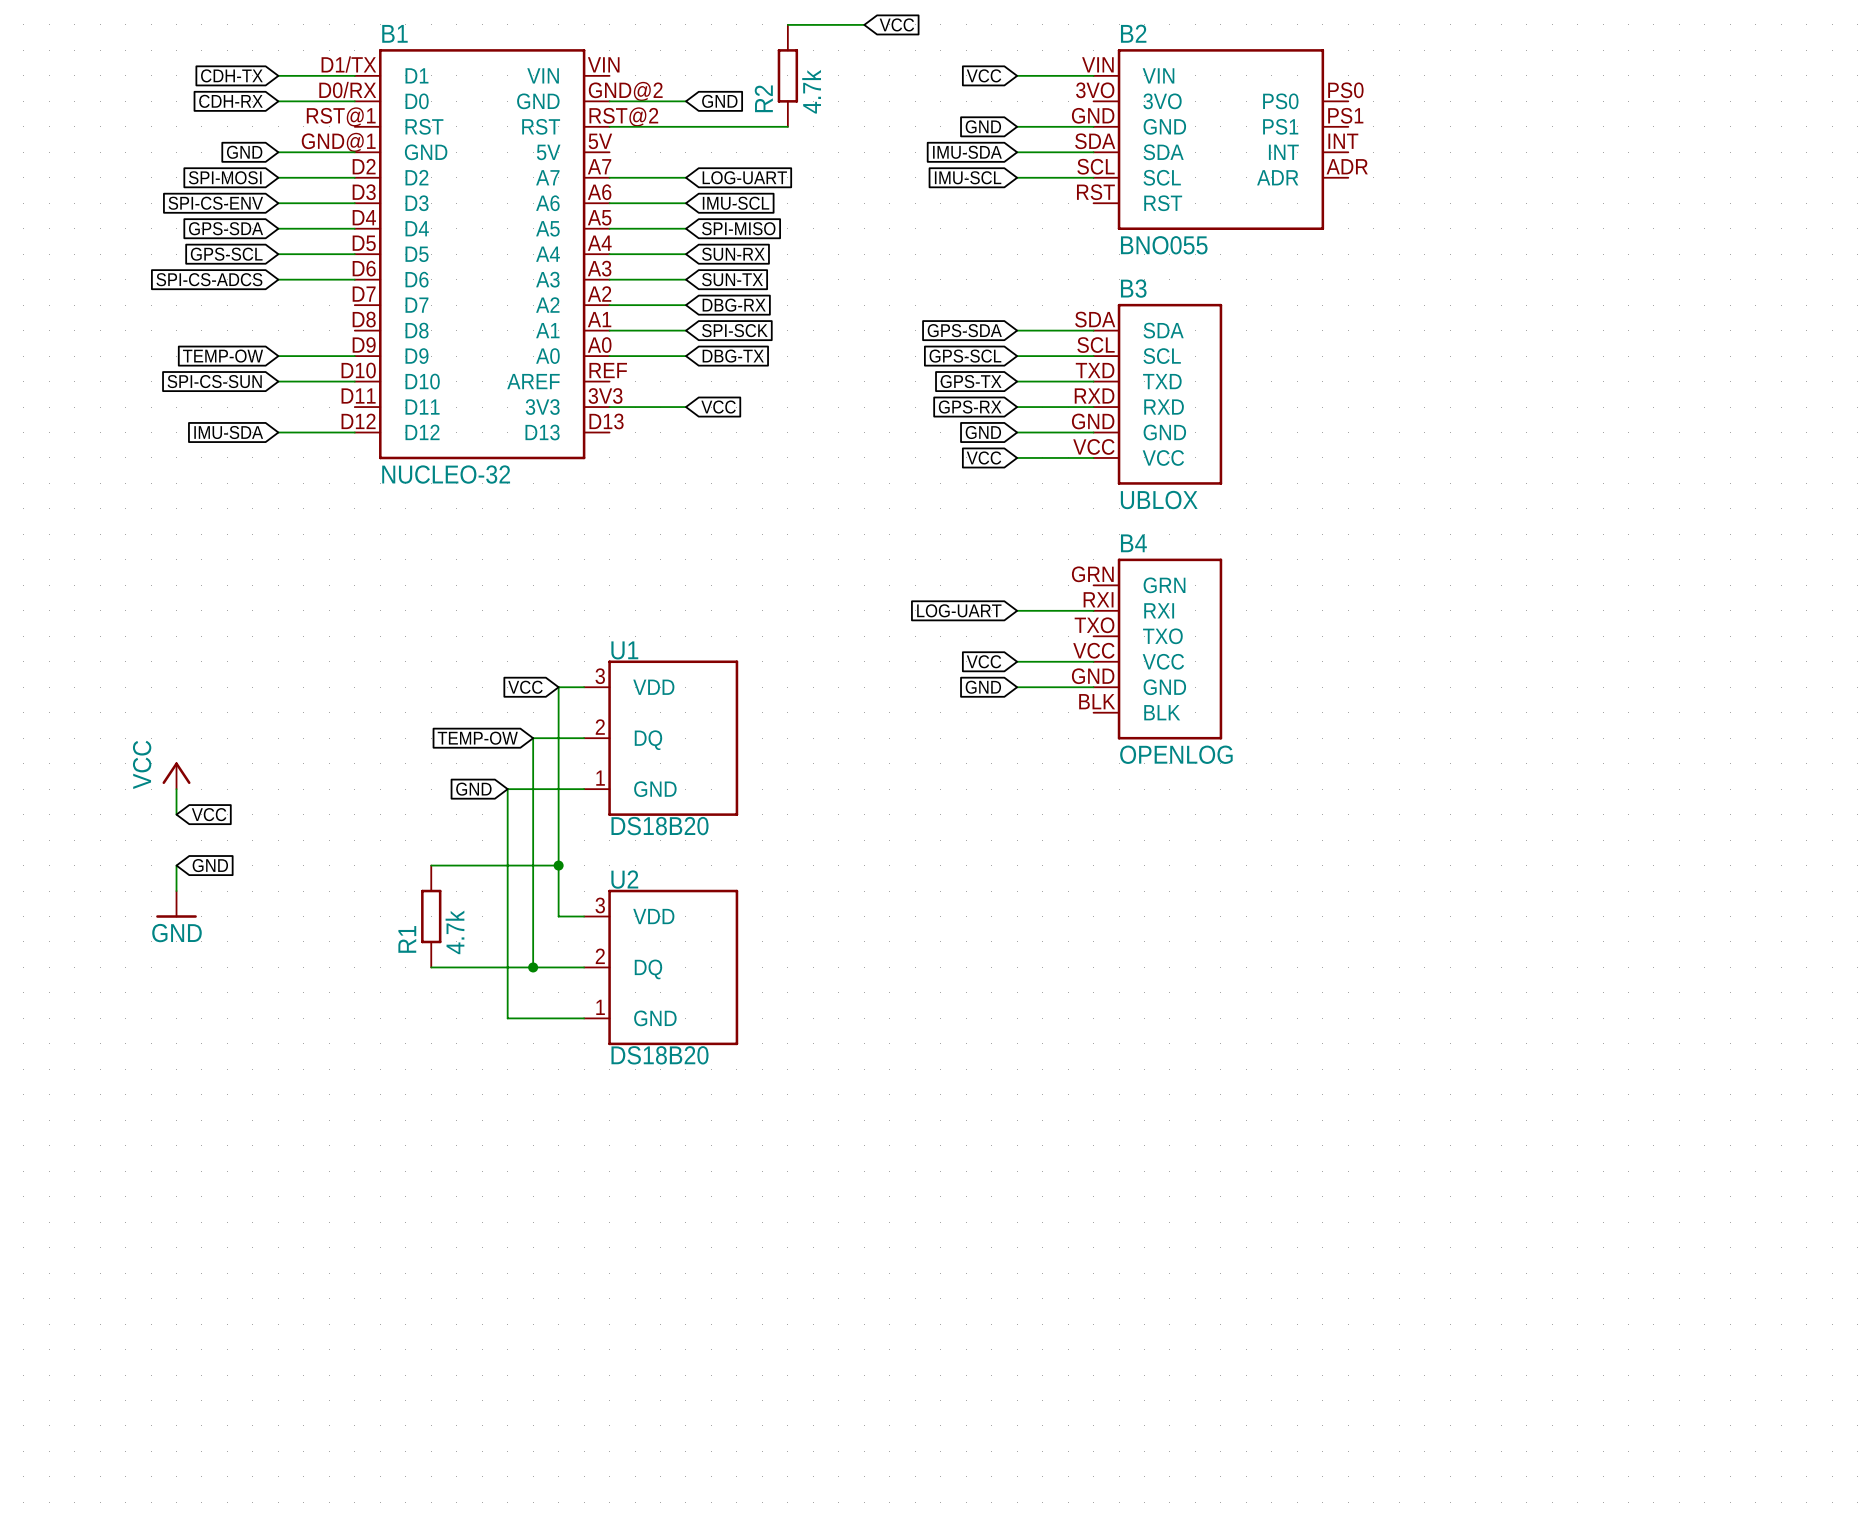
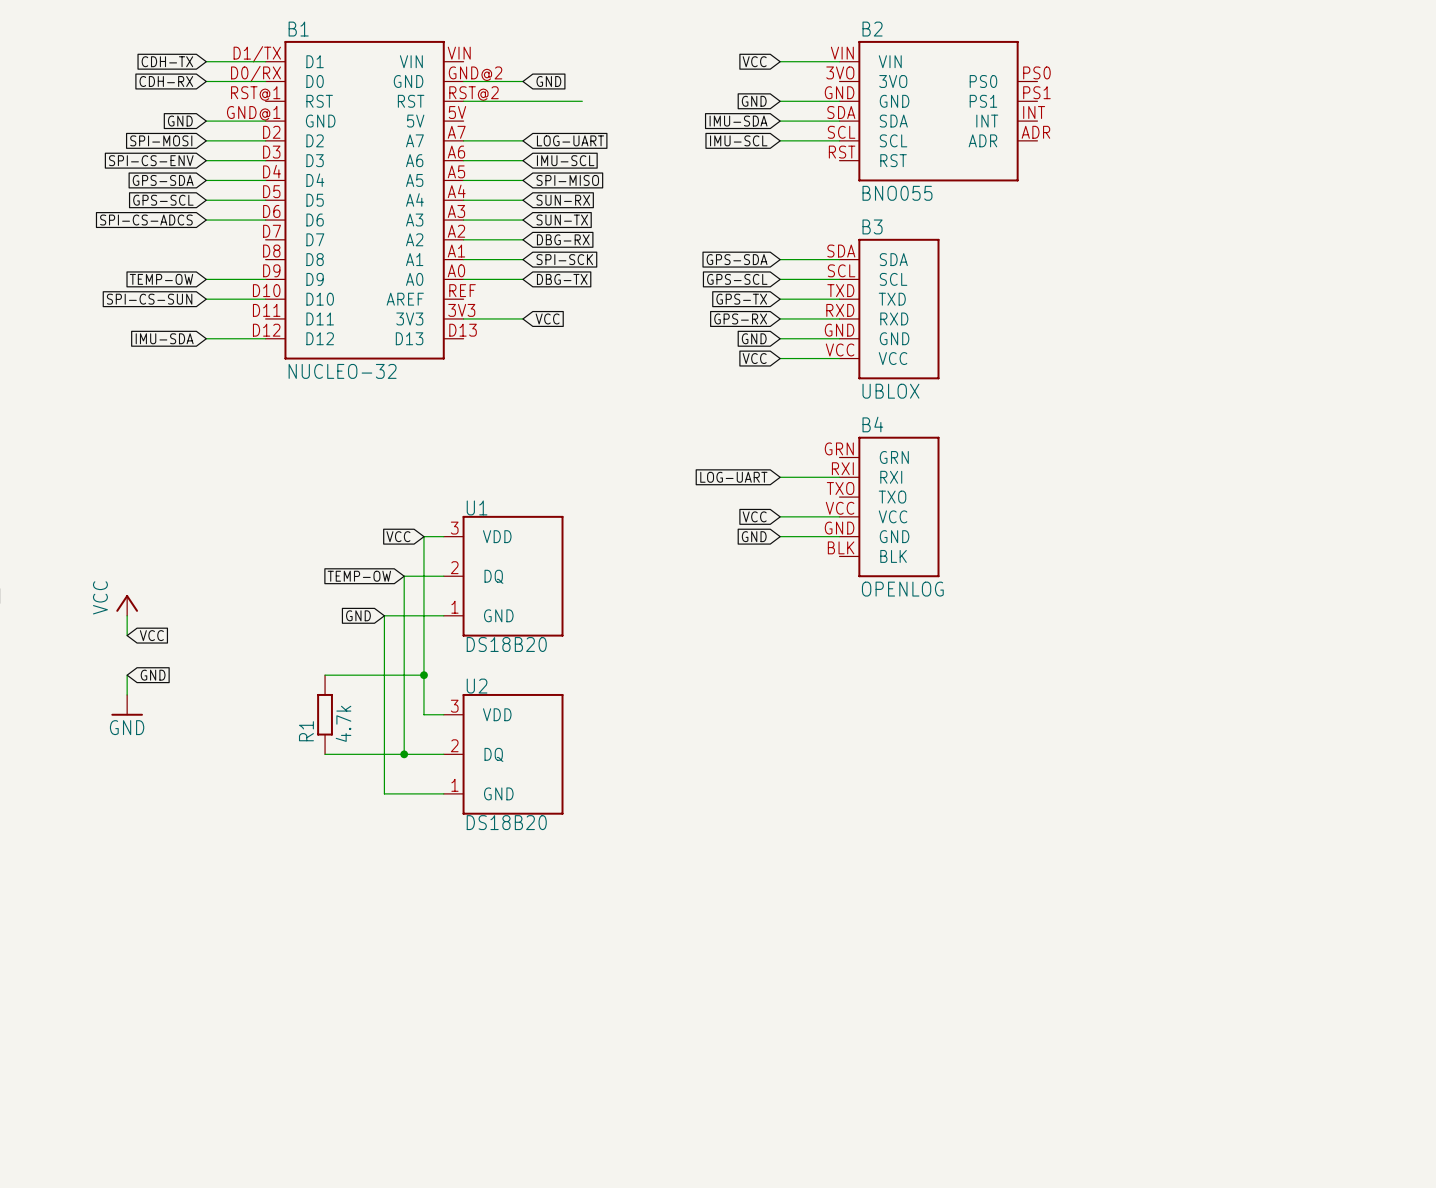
wire: (787, 24) (864, 24) -> none
global label: VCC (896, 24) -> none
R2: 4.7k (787, 75) -> none
wire: (762, 126) (787, 126) -> none

